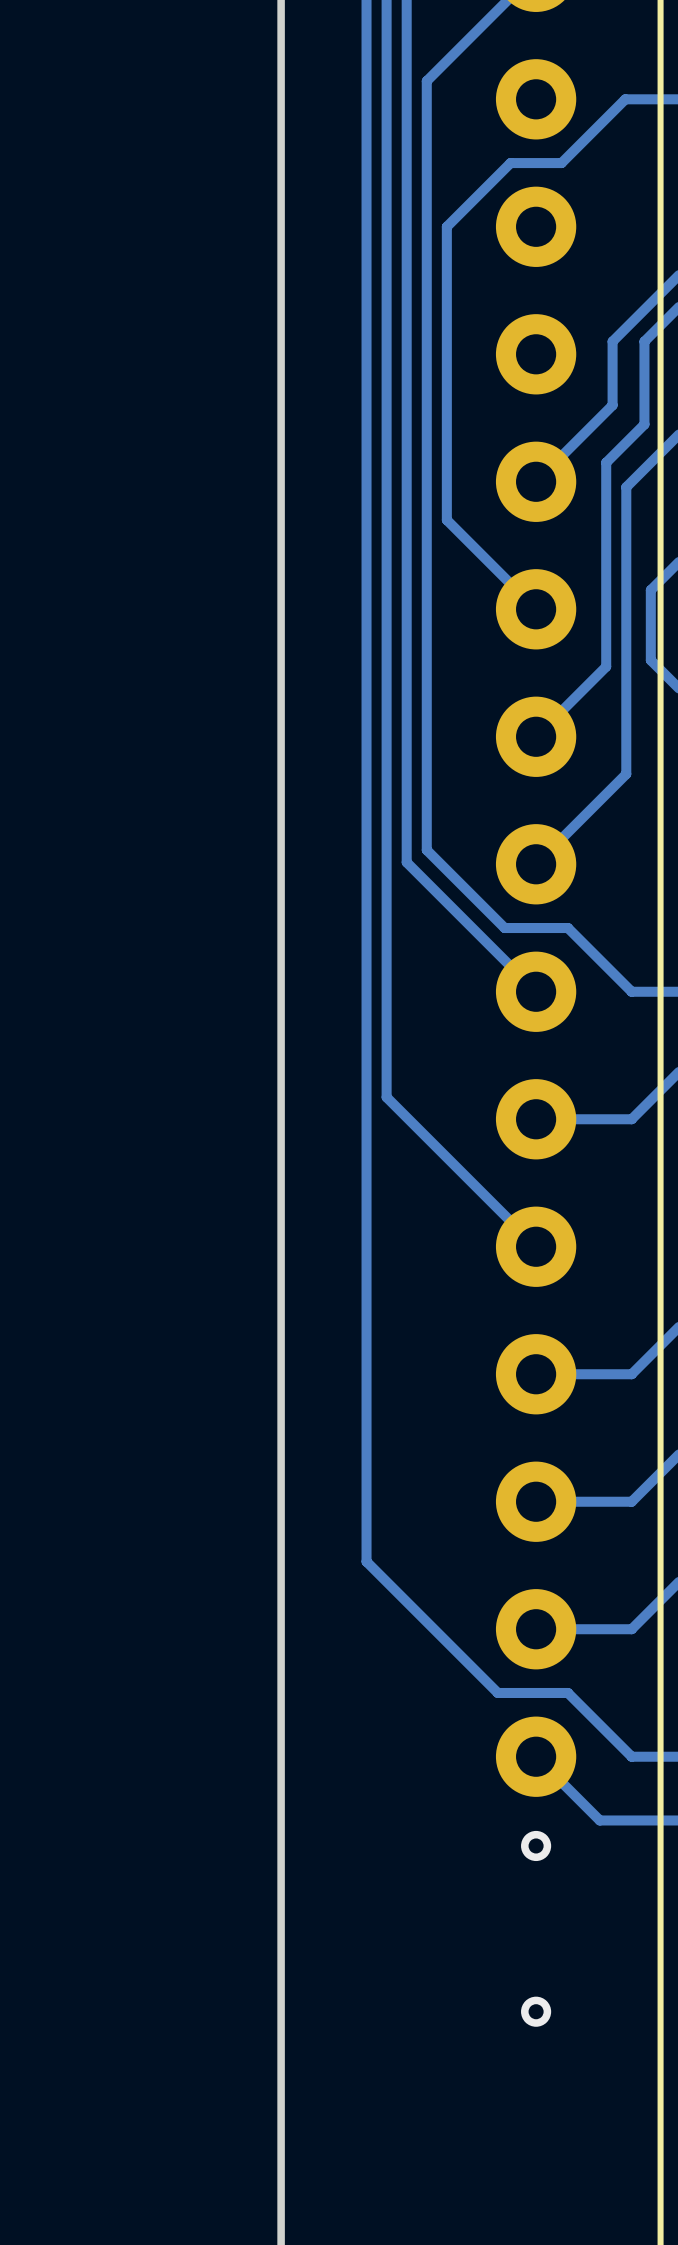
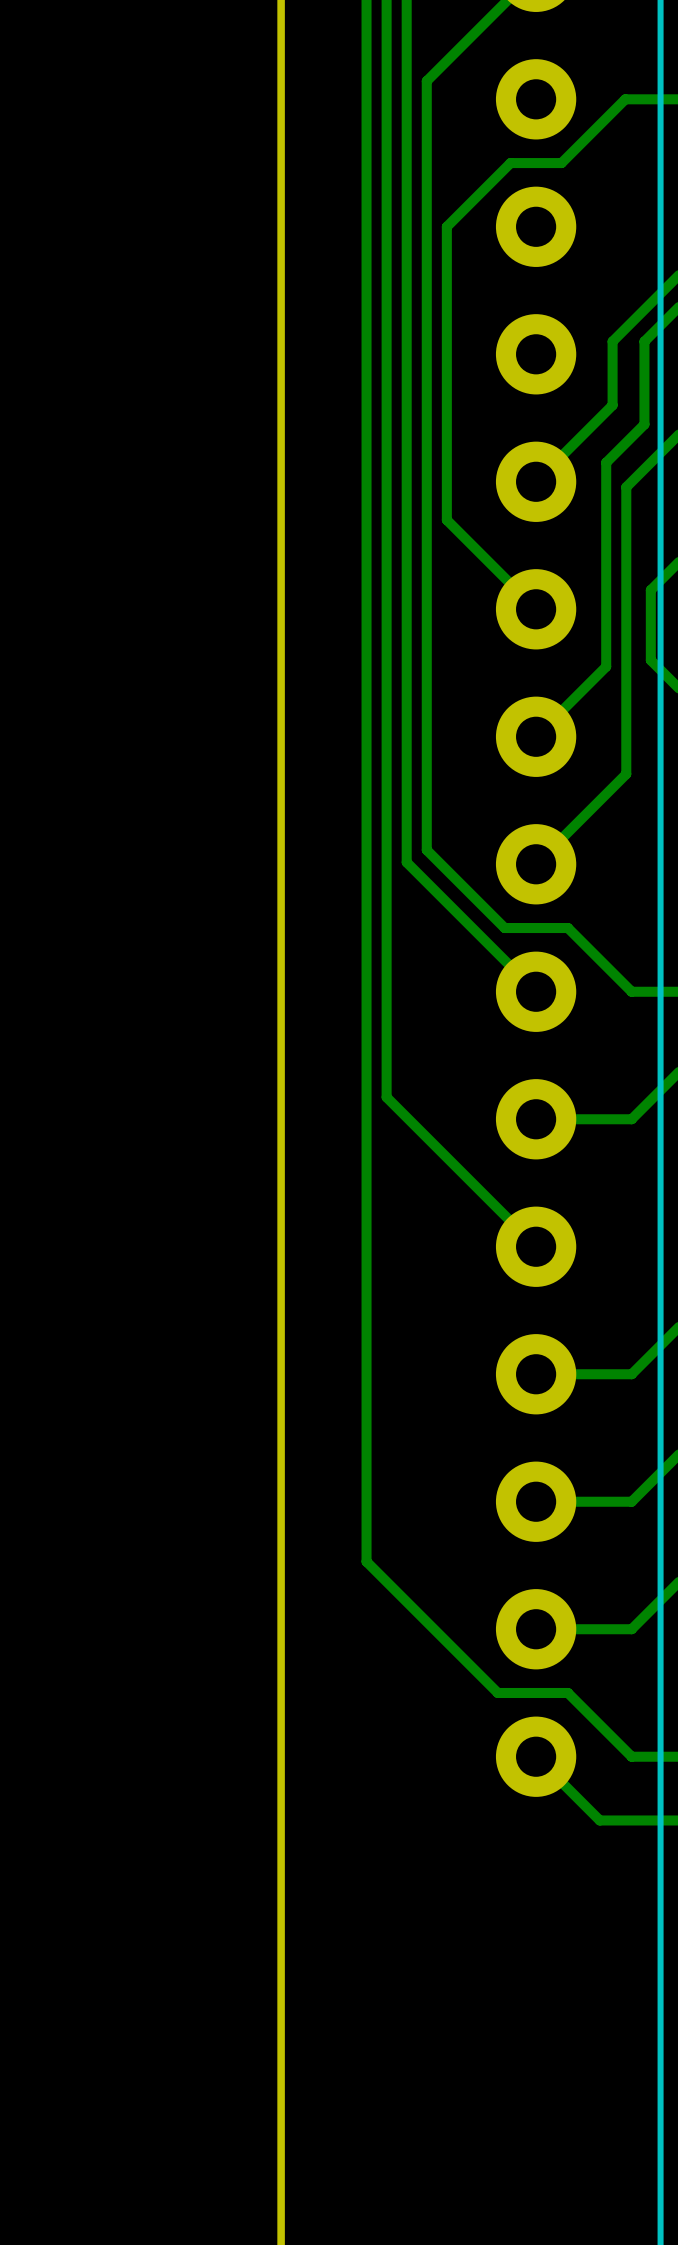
via: (536, 1845) -> none
via: (536, 2011) -> none

